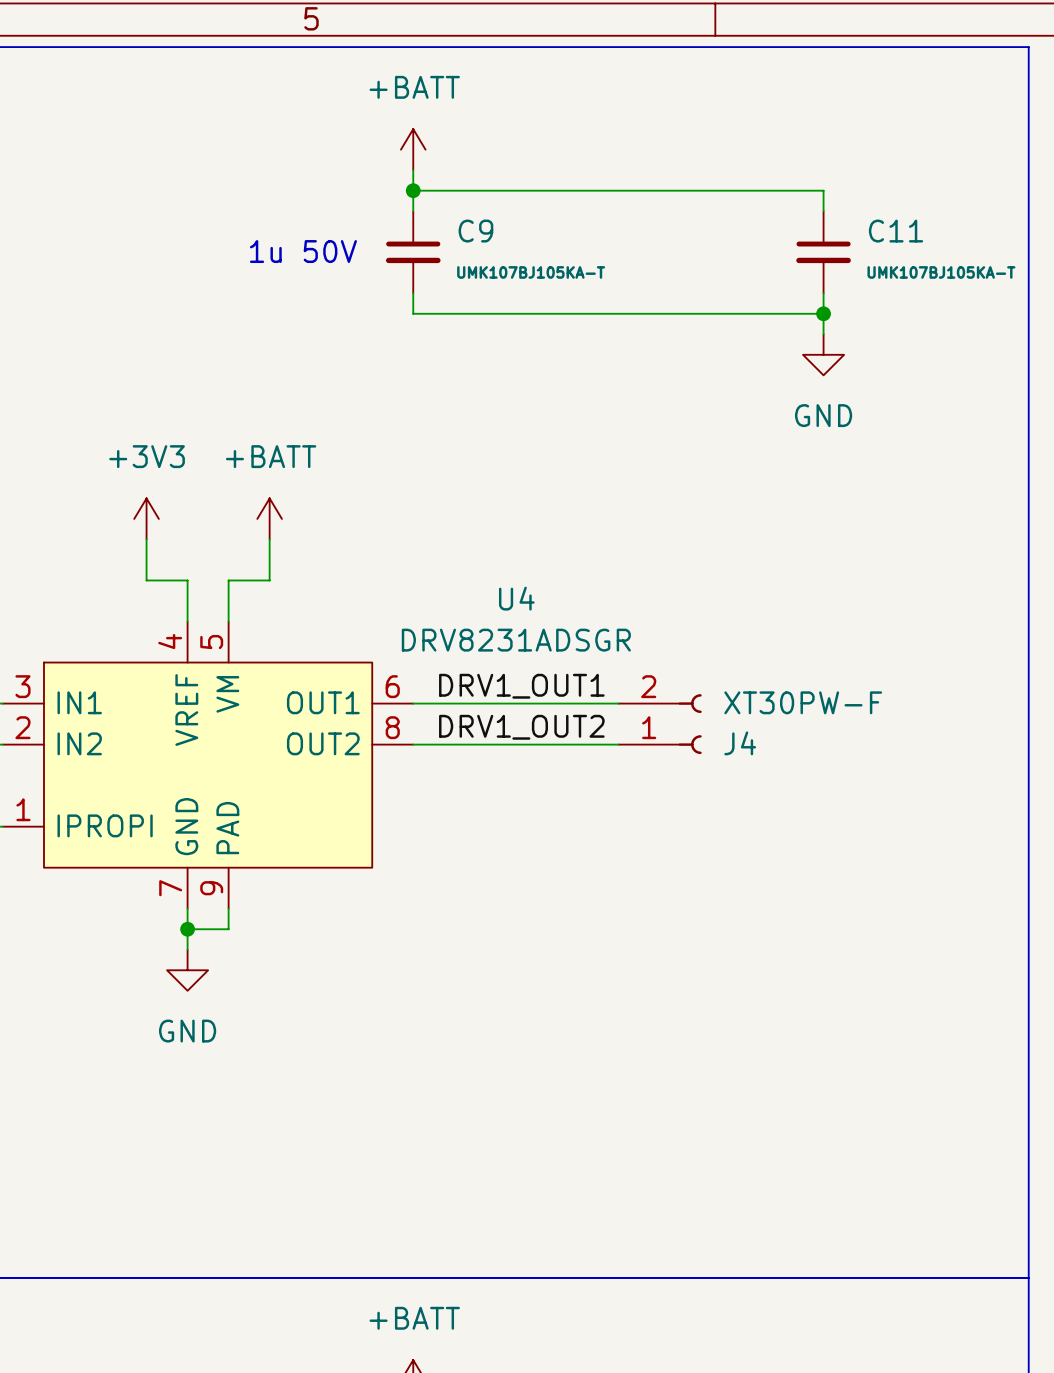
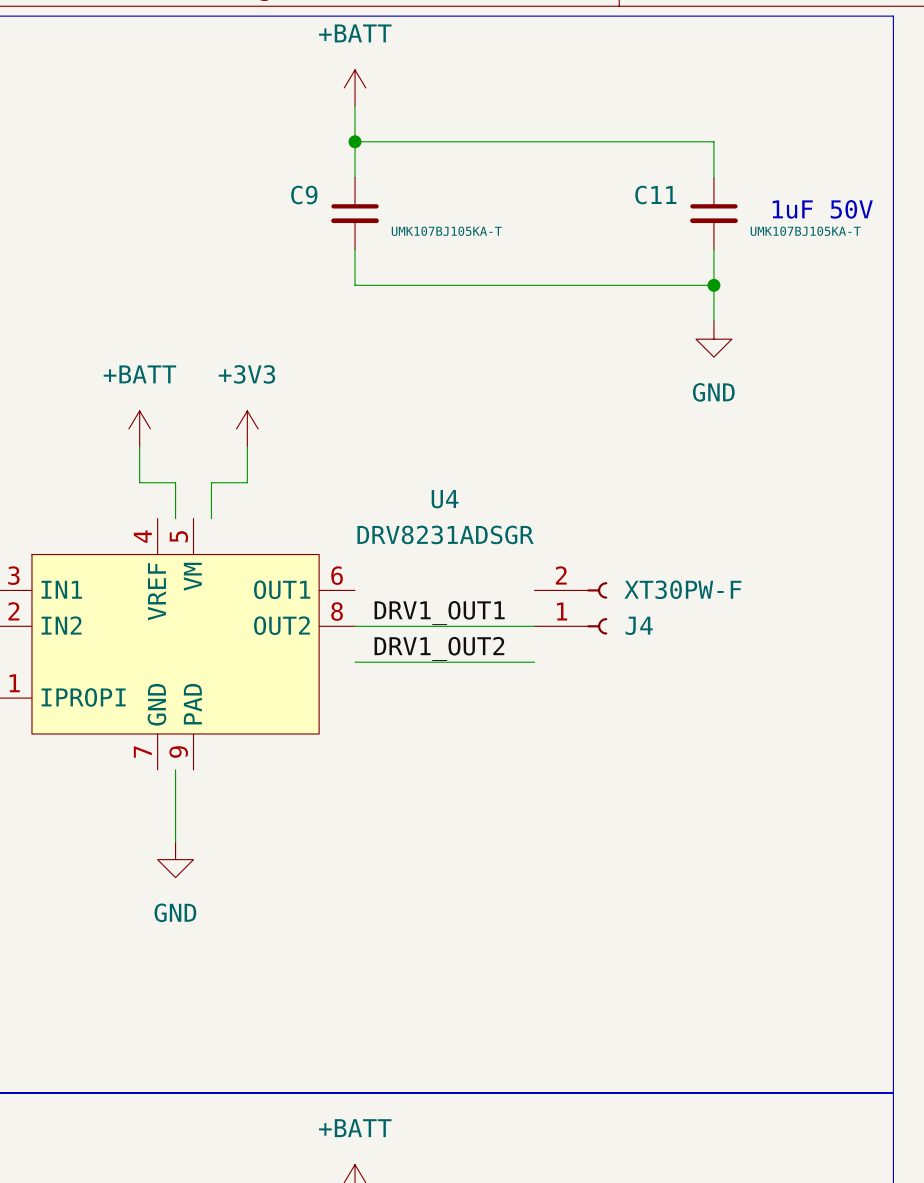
power symbol position: +BATT (413, 149) -> +BATT (355, 87)
C9 name position: C9 (475, 231) -> C9 (304, 195)
C11 name position: C11 (896, 231) -> C11 (655, 195)
text: 1u 50V (303, 251) -> none
C9 position: (413, 252) -> (355, 213)
C11 position: (823, 252) -> (713, 213)
text: none -> 1uF 50V (822, 209)
wire: (413, 293) (413, 313) (823, 313) (823, 293) -> none
wire: none -> (355, 249) (355, 285) (713, 285)
junction position: (823, 313) -> (713, 285)
wire: none -> (713, 267) (713, 321)
power symbol position: GND (823, 354) -> GND (713, 339)
power symbol position: +3V3 (146, 518) -> +3V3 (247, 428)
power symbol position: +BATT (269, 518) -> +BATT (139, 428)
wire: (146, 539) (146, 580) (167, 580) -> (139, 446) (139, 482)
wire: (269, 539) (269, 580) -> (247, 446) (247, 482) (229, 482)
wire: (187, 580) (187, 621) -> (157, 482) (175, 482) (175, 518)
wire: (249, 580) (228, 580) (228, 621) -> (211, 482) (211, 518)
label: DRV1_OUT1 (521, 686) -> none
wire: (413, 703) (618, 703) -> (355, 662) (534, 662)
label: DRV1_OUT2 (521, 727) -> DRV1_OUT1 (439, 613)
label: none -> DRV1_OUT2 (439, 648)
wire: (187, 908) (187, 949) -> none
wire: none -> (175, 769) (175, 841)
wire: (228, 908) (228, 929) (187, 929) -> none
junction: (187, 929) -> none
power symbol position: GND (187, 970) -> GND (175, 859)

